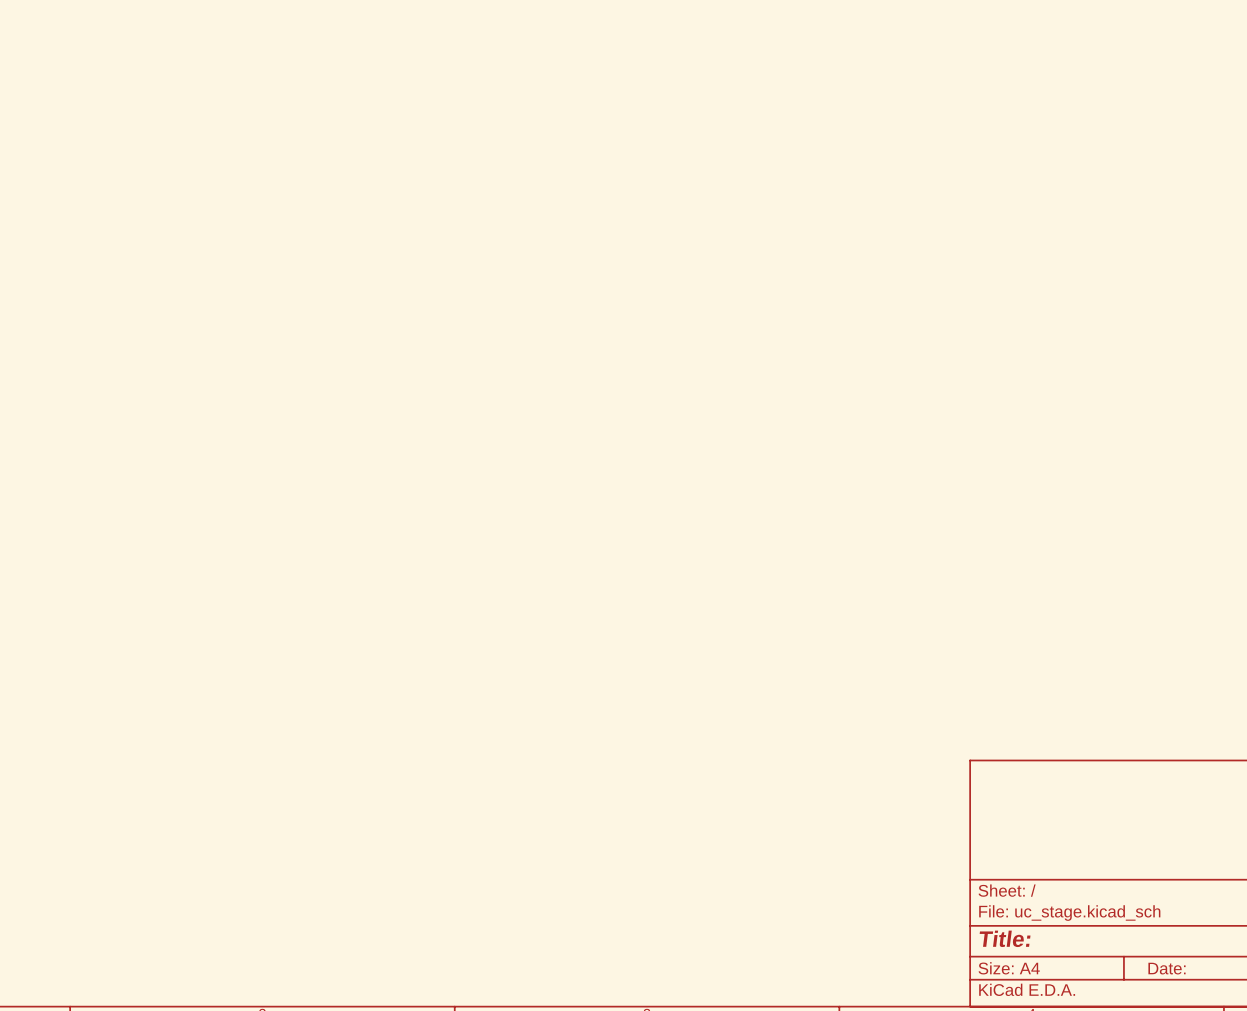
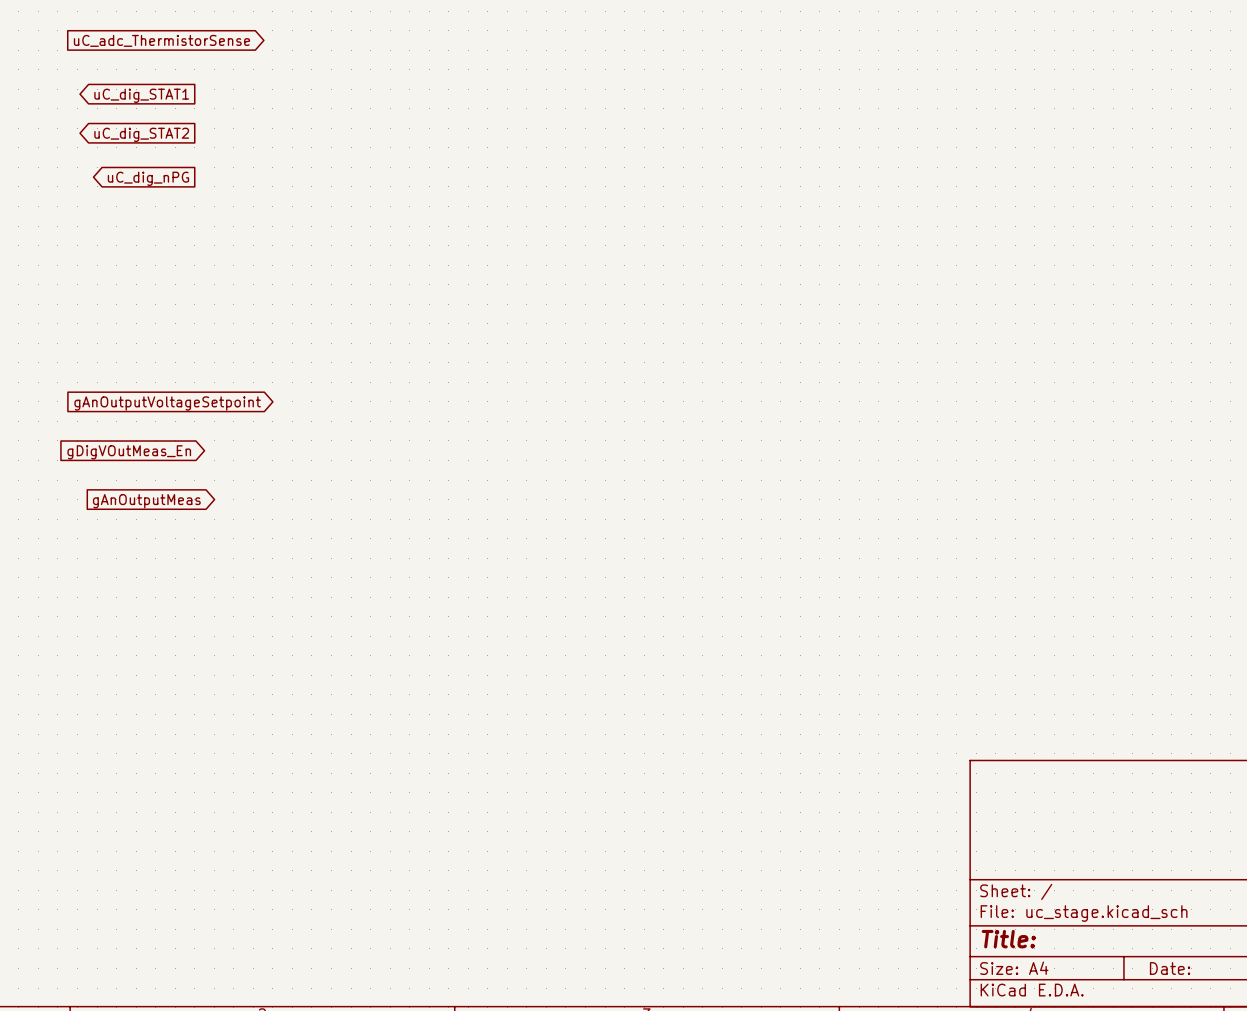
global label: none -> uC_adc_ThermistorSense (161, 40)
global label: none -> uC_dig_STAT1 (141, 95)
global label: none -> uC_dig_STAT2 (141, 134)
global label: none -> uC_dig_nPG (148, 178)
global label: none -> gAnOutputVoltageSetpoint (167, 403)
global label: none -> gDigVOutMeas_En (129, 452)
global label: none -> gAnOutputMeas (146, 501)

